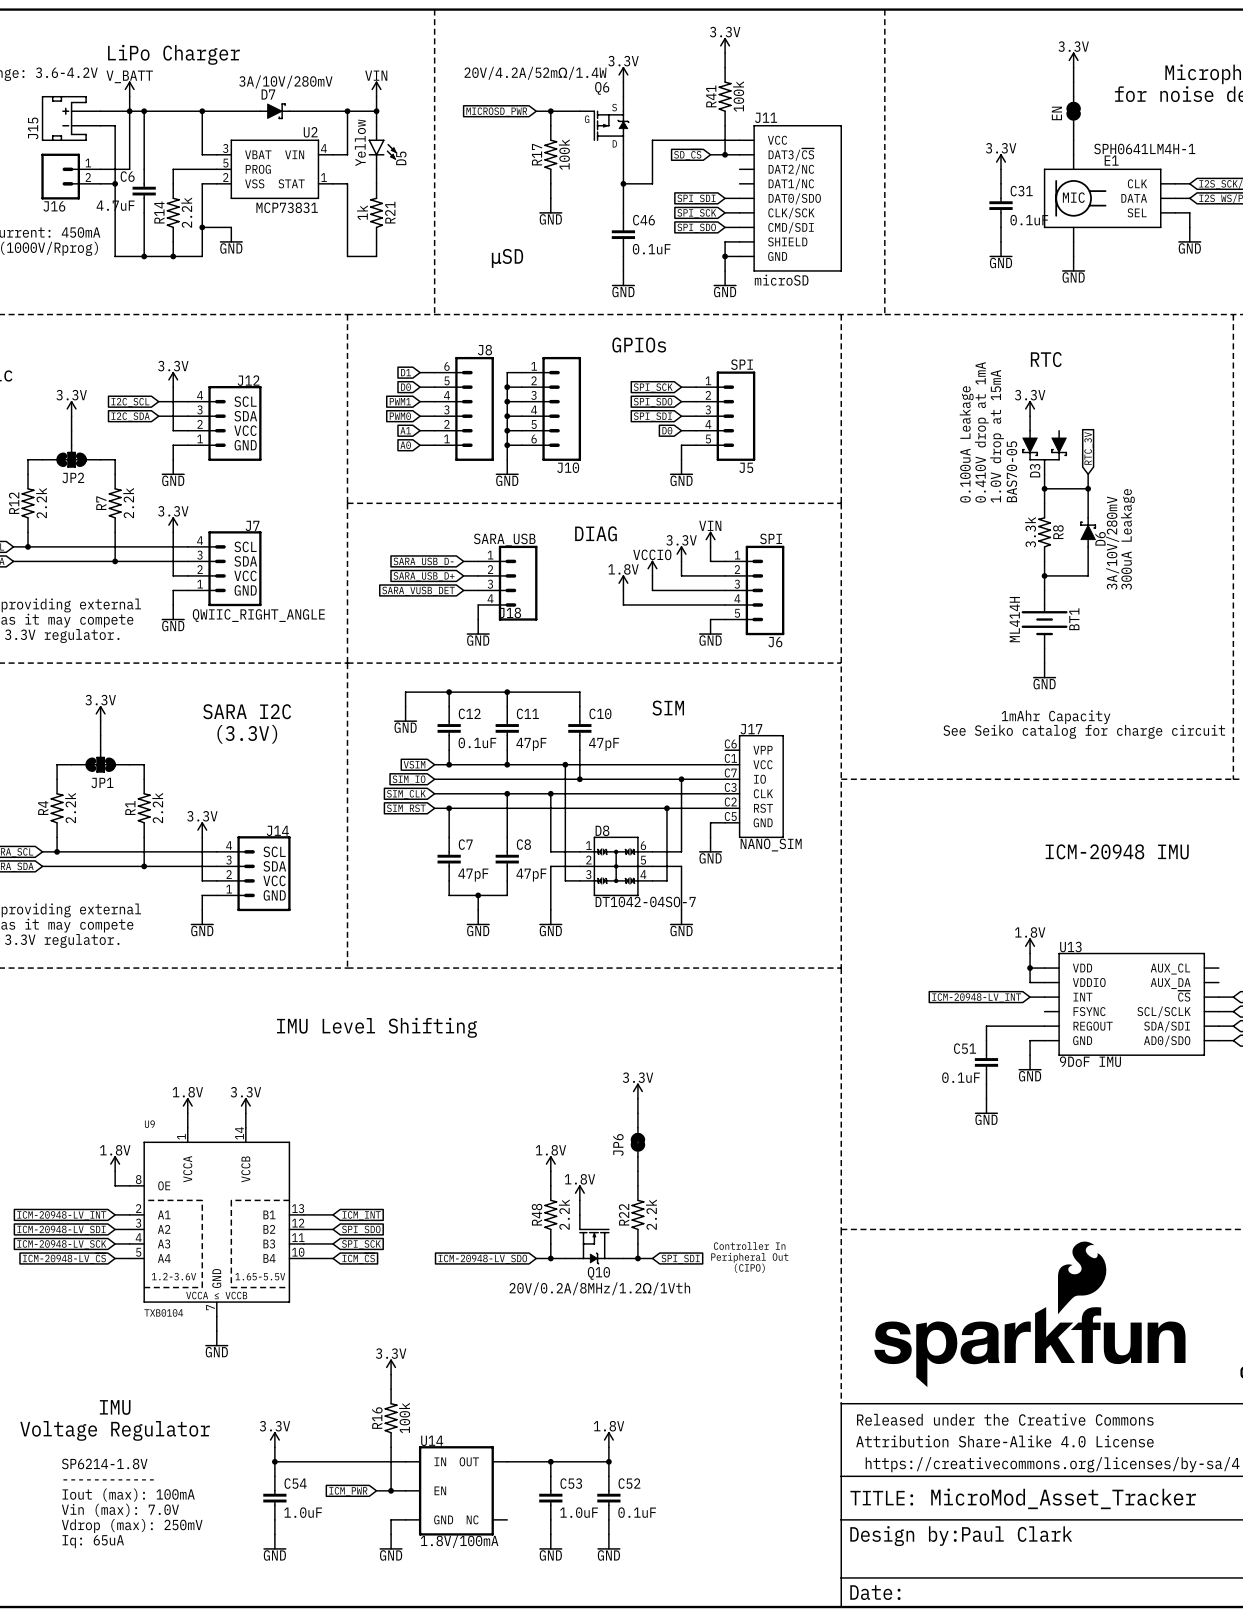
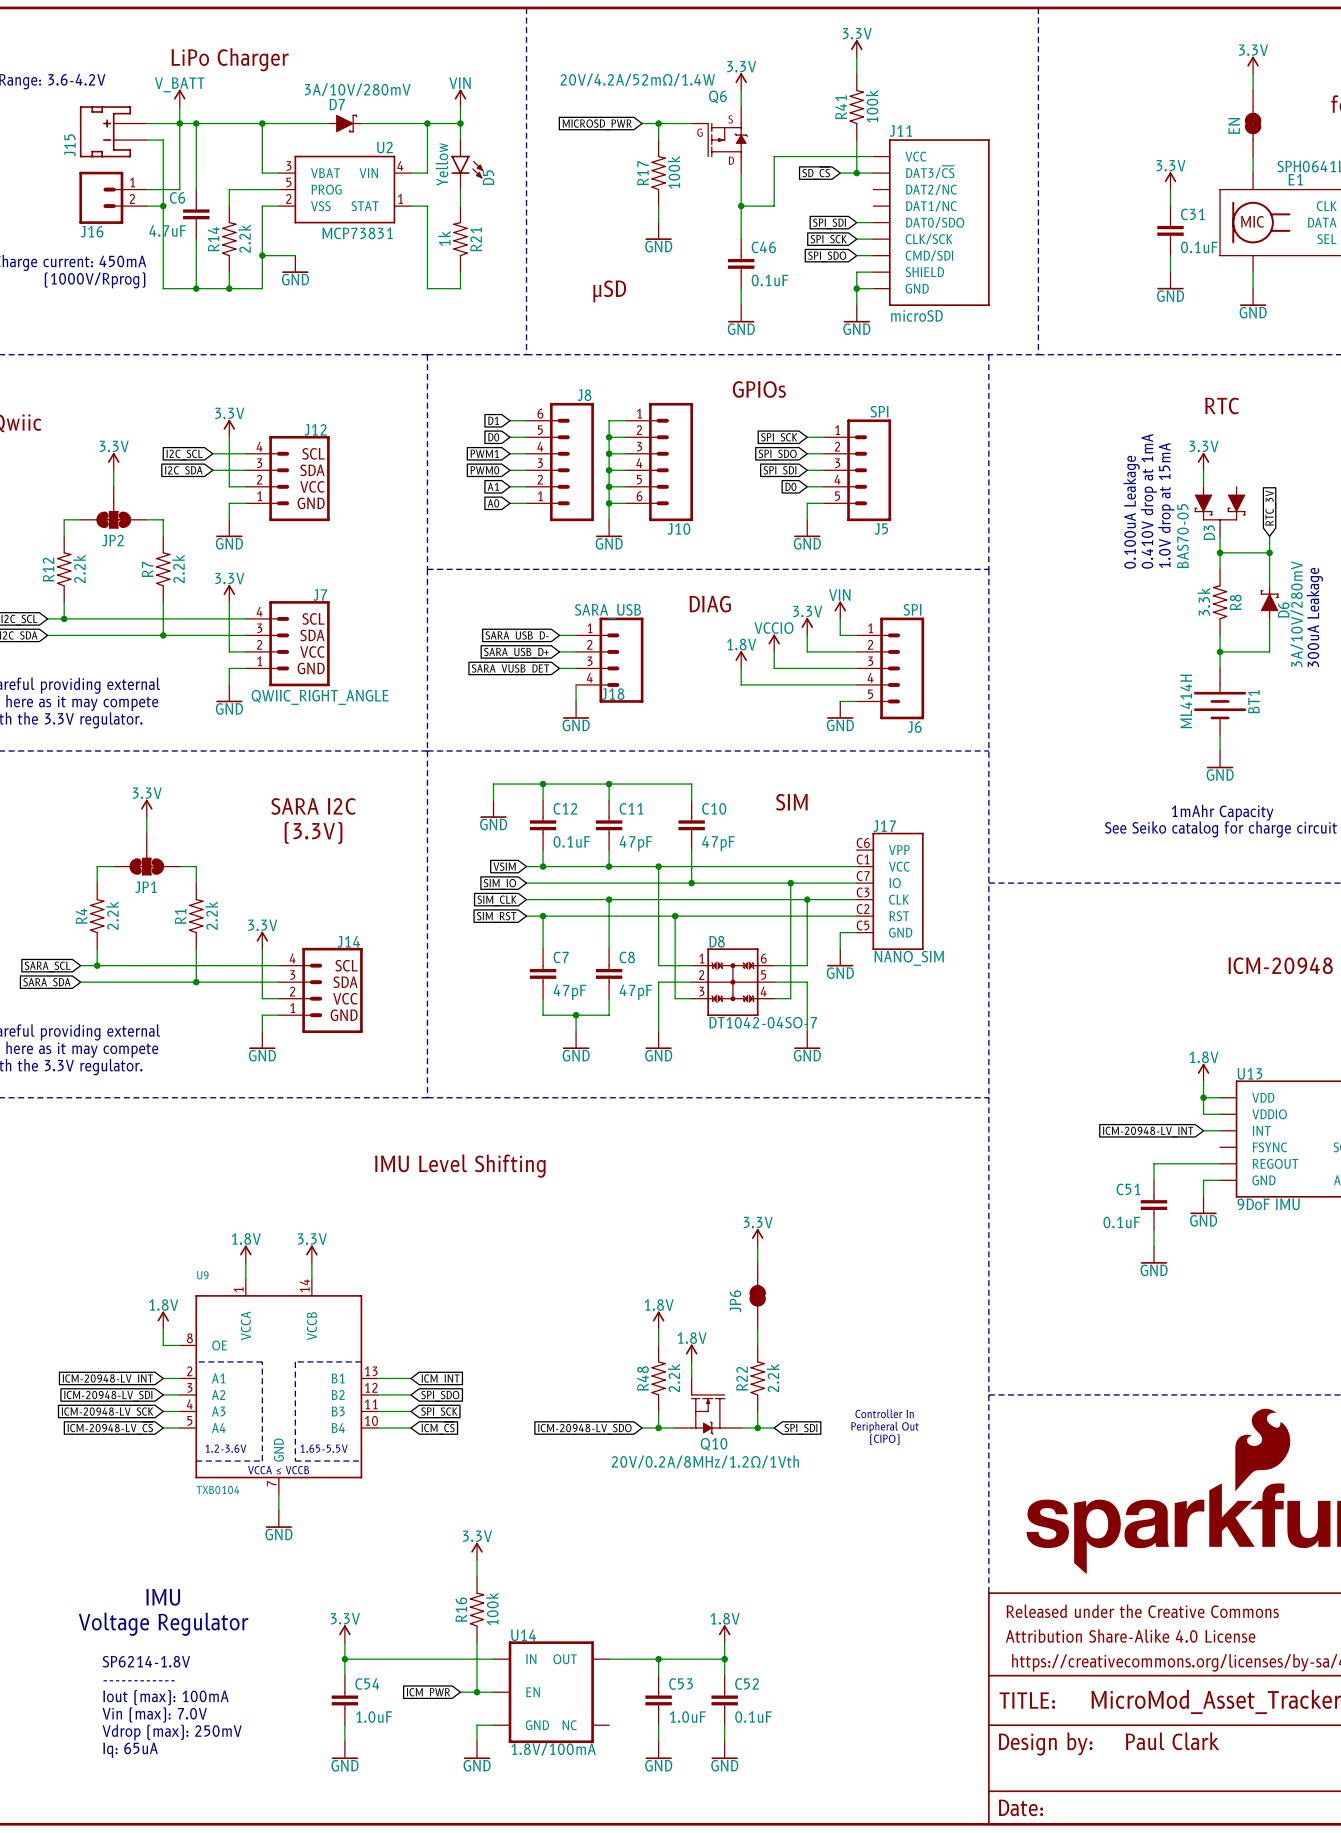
wire: none -> (658, 866) (658, 899)
junction: none -> (658, 866)
wire: (565, 764) (565, 808) -> none
junction: (565, 764) -> none
wire: none -> (790, 883) (790, 916)
junction: none -> (790, 883)
wire: (681, 779) (681, 793) -> none
junction: (681, 779) -> none
junction: (550, 793) -> none
junction: none -> (807, 899)
junction: none -> (675, 916)
junction: (666, 808) -> none

